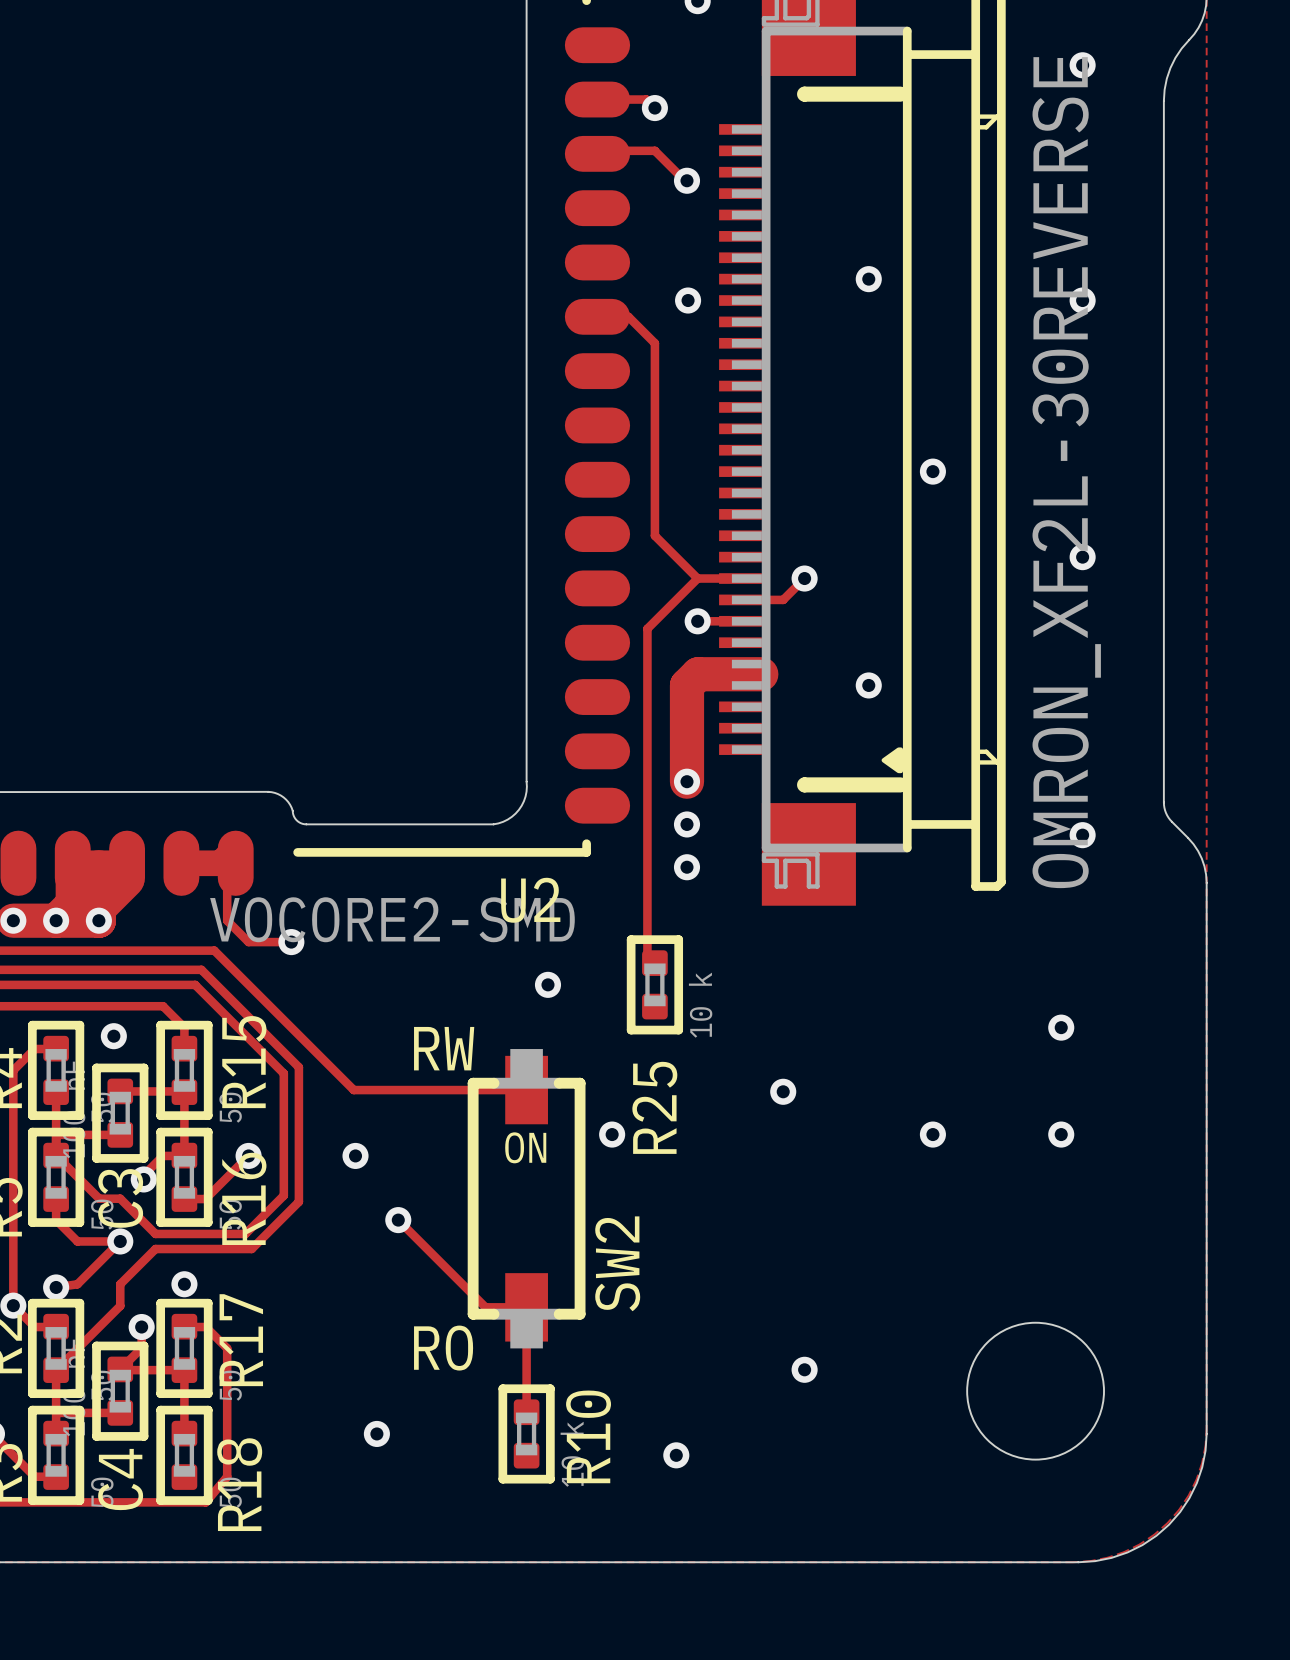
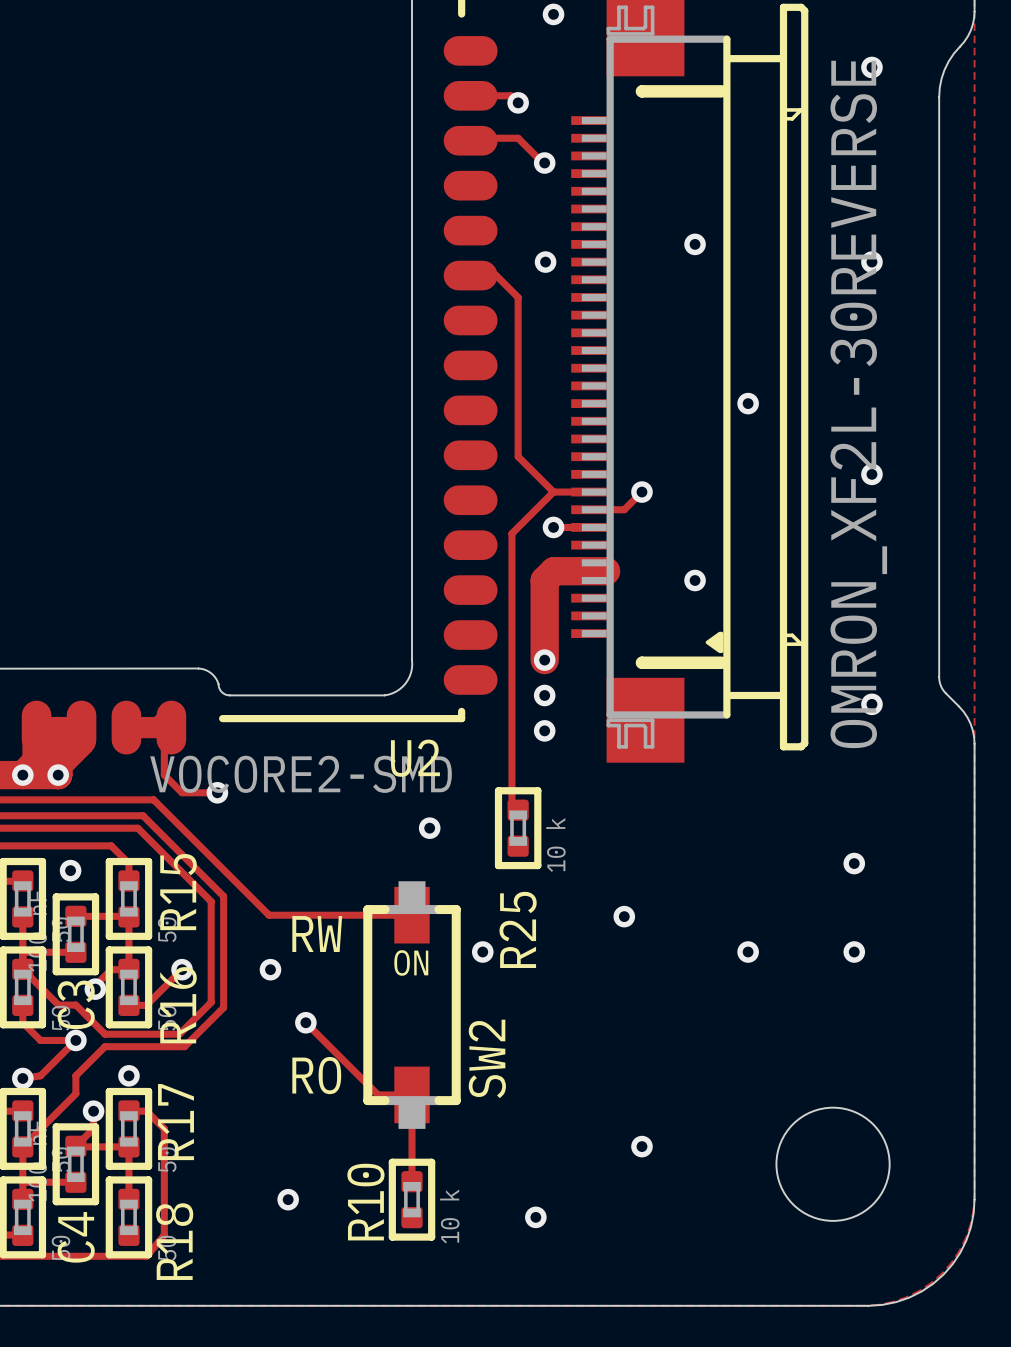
text position: RW (444, 1048) -> RW (317, 934)
text position: RO (443, 1348) -> RO (316, 1075)
R10 name position: R10 (588, 1436) -> R10 (365, 1202)

